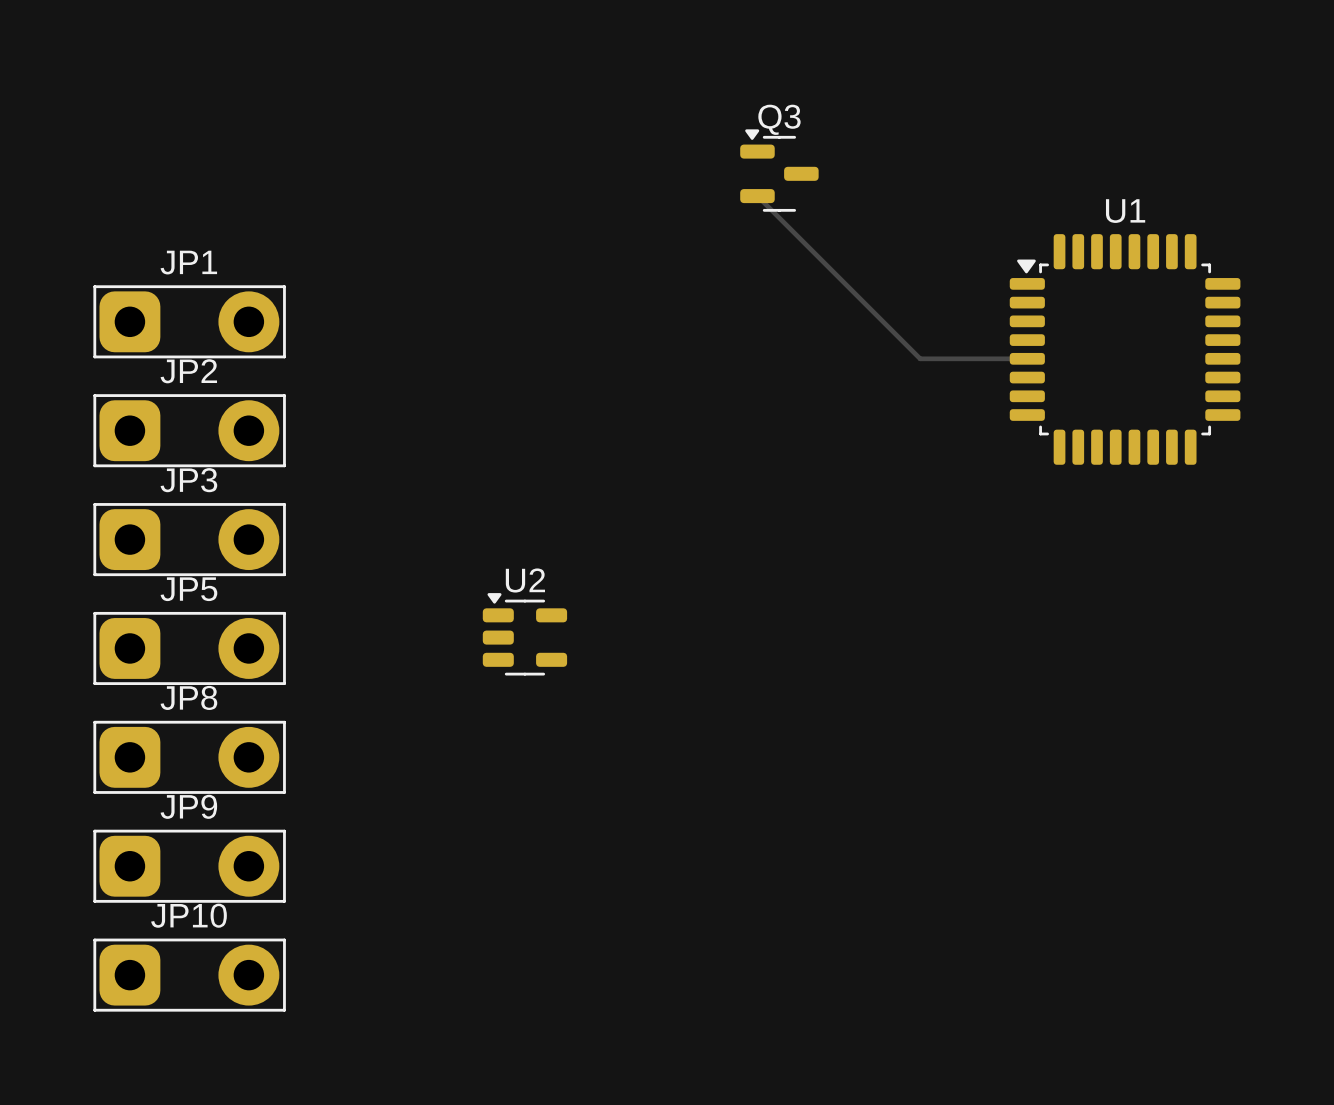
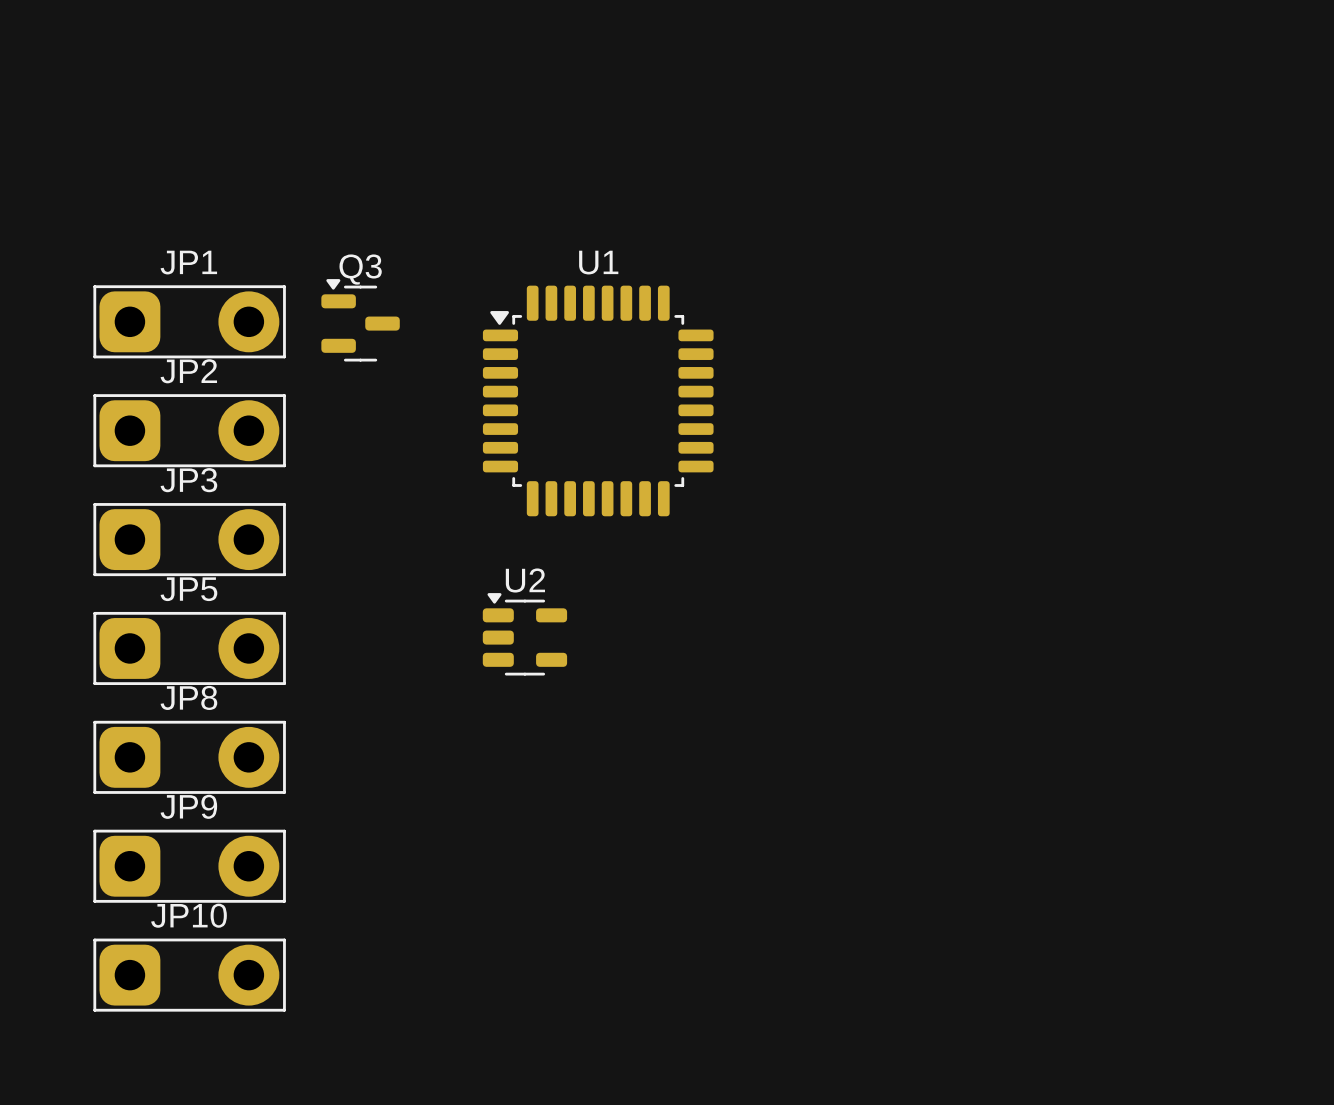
Q3 position: (779, 170) -> (360, 320)
track: (757, 196) (920, 358) (1027, 358) -> none
U1 position: (1125, 349) -> (598, 400)

